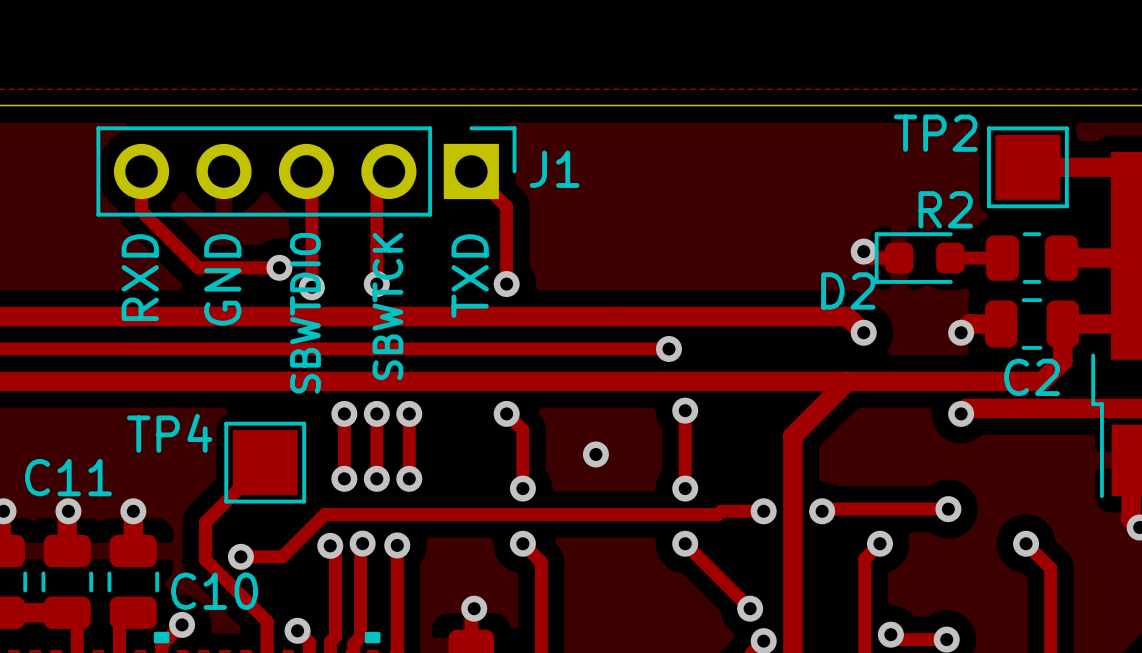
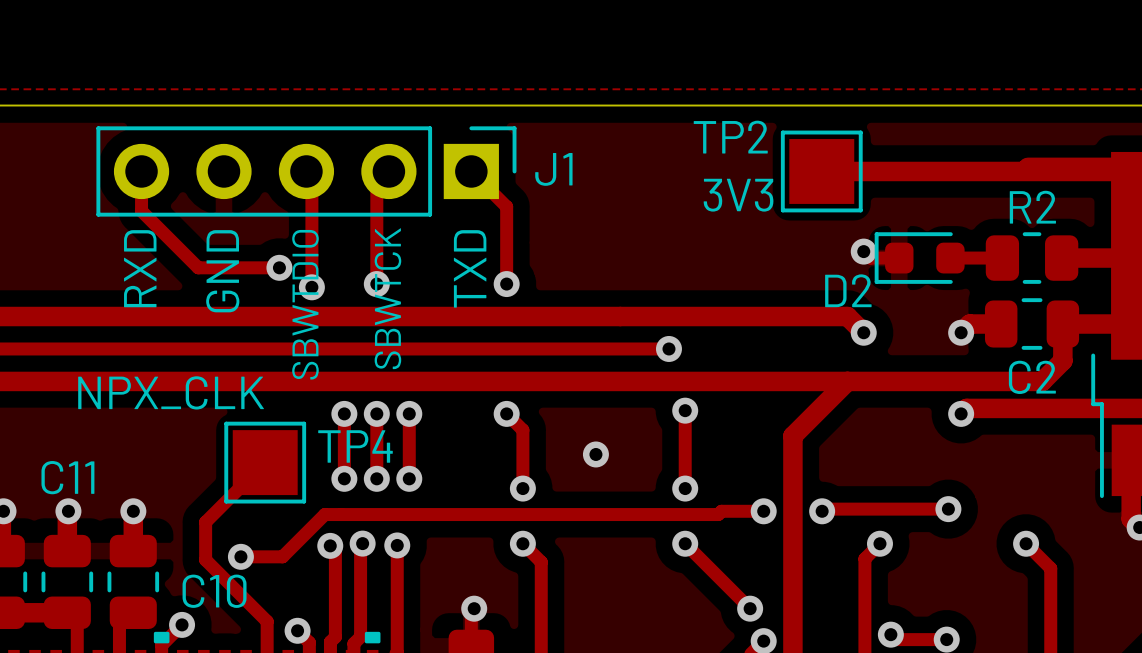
TP2 position: (1027, 167) -> (821, 171)
track: none -> (821, 171) (1120, 171)
text: none -> 3V3 (738, 195)
R2 name position: R2 (945, 209) -> R2 (1032, 207)
text: none -> NPX_CLK (171, 392)
TP4 name position: TP4 (169, 433) -> TP4 (355, 446)

